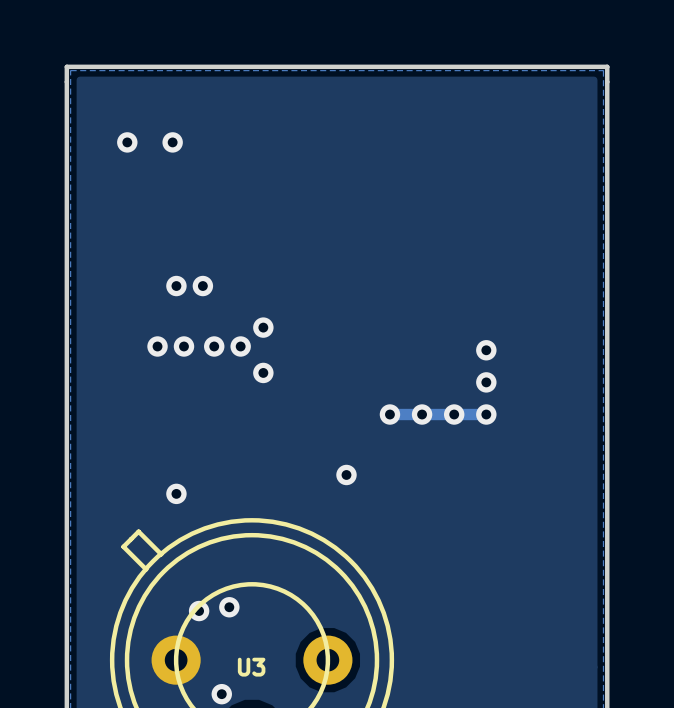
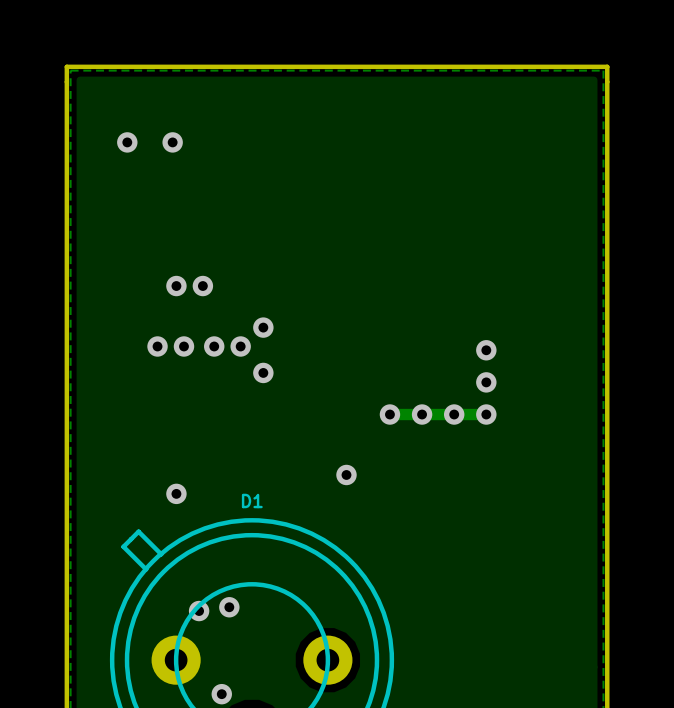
U3 name: U3 (251, 667) -> D1 (252, 500)

